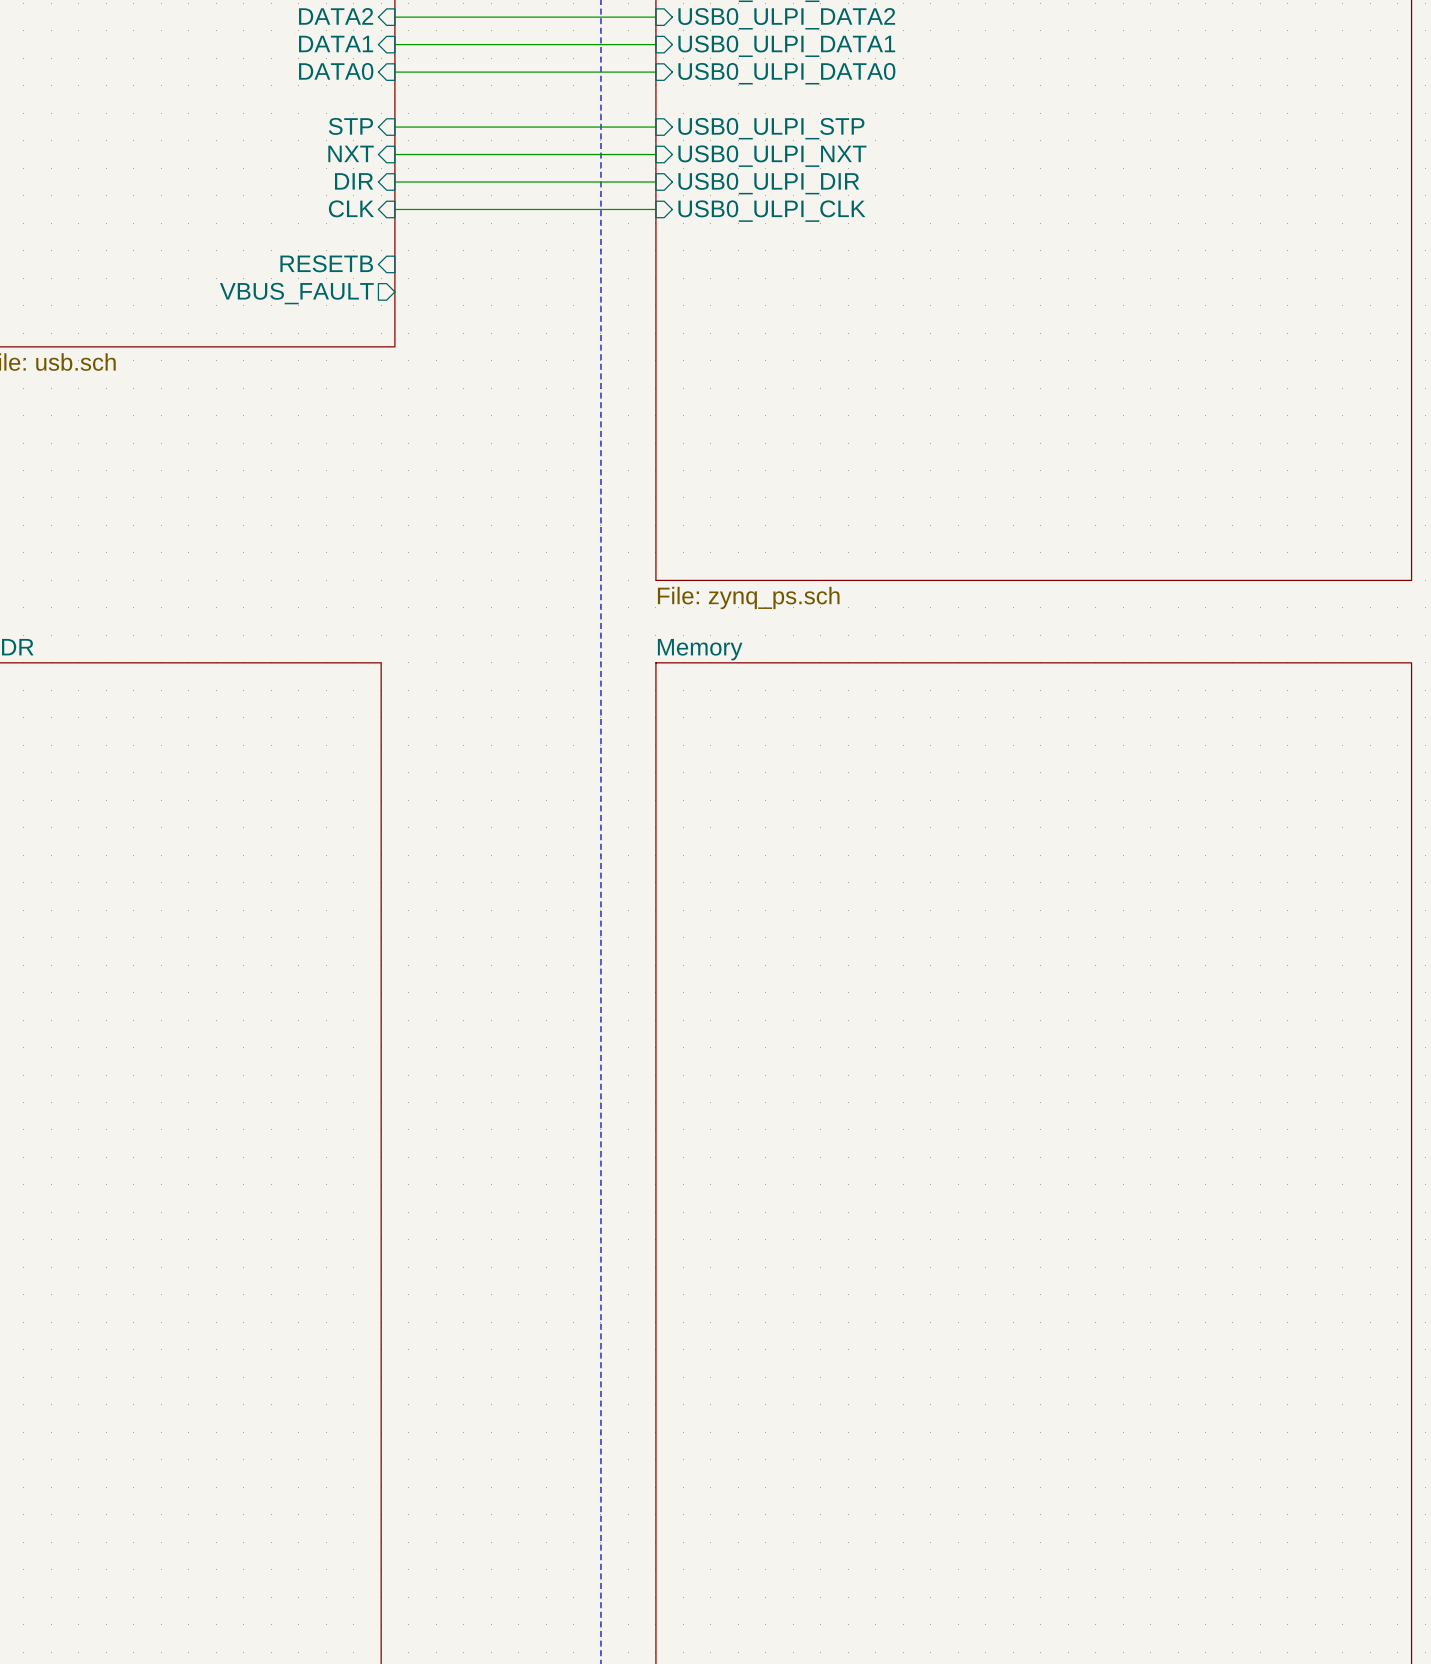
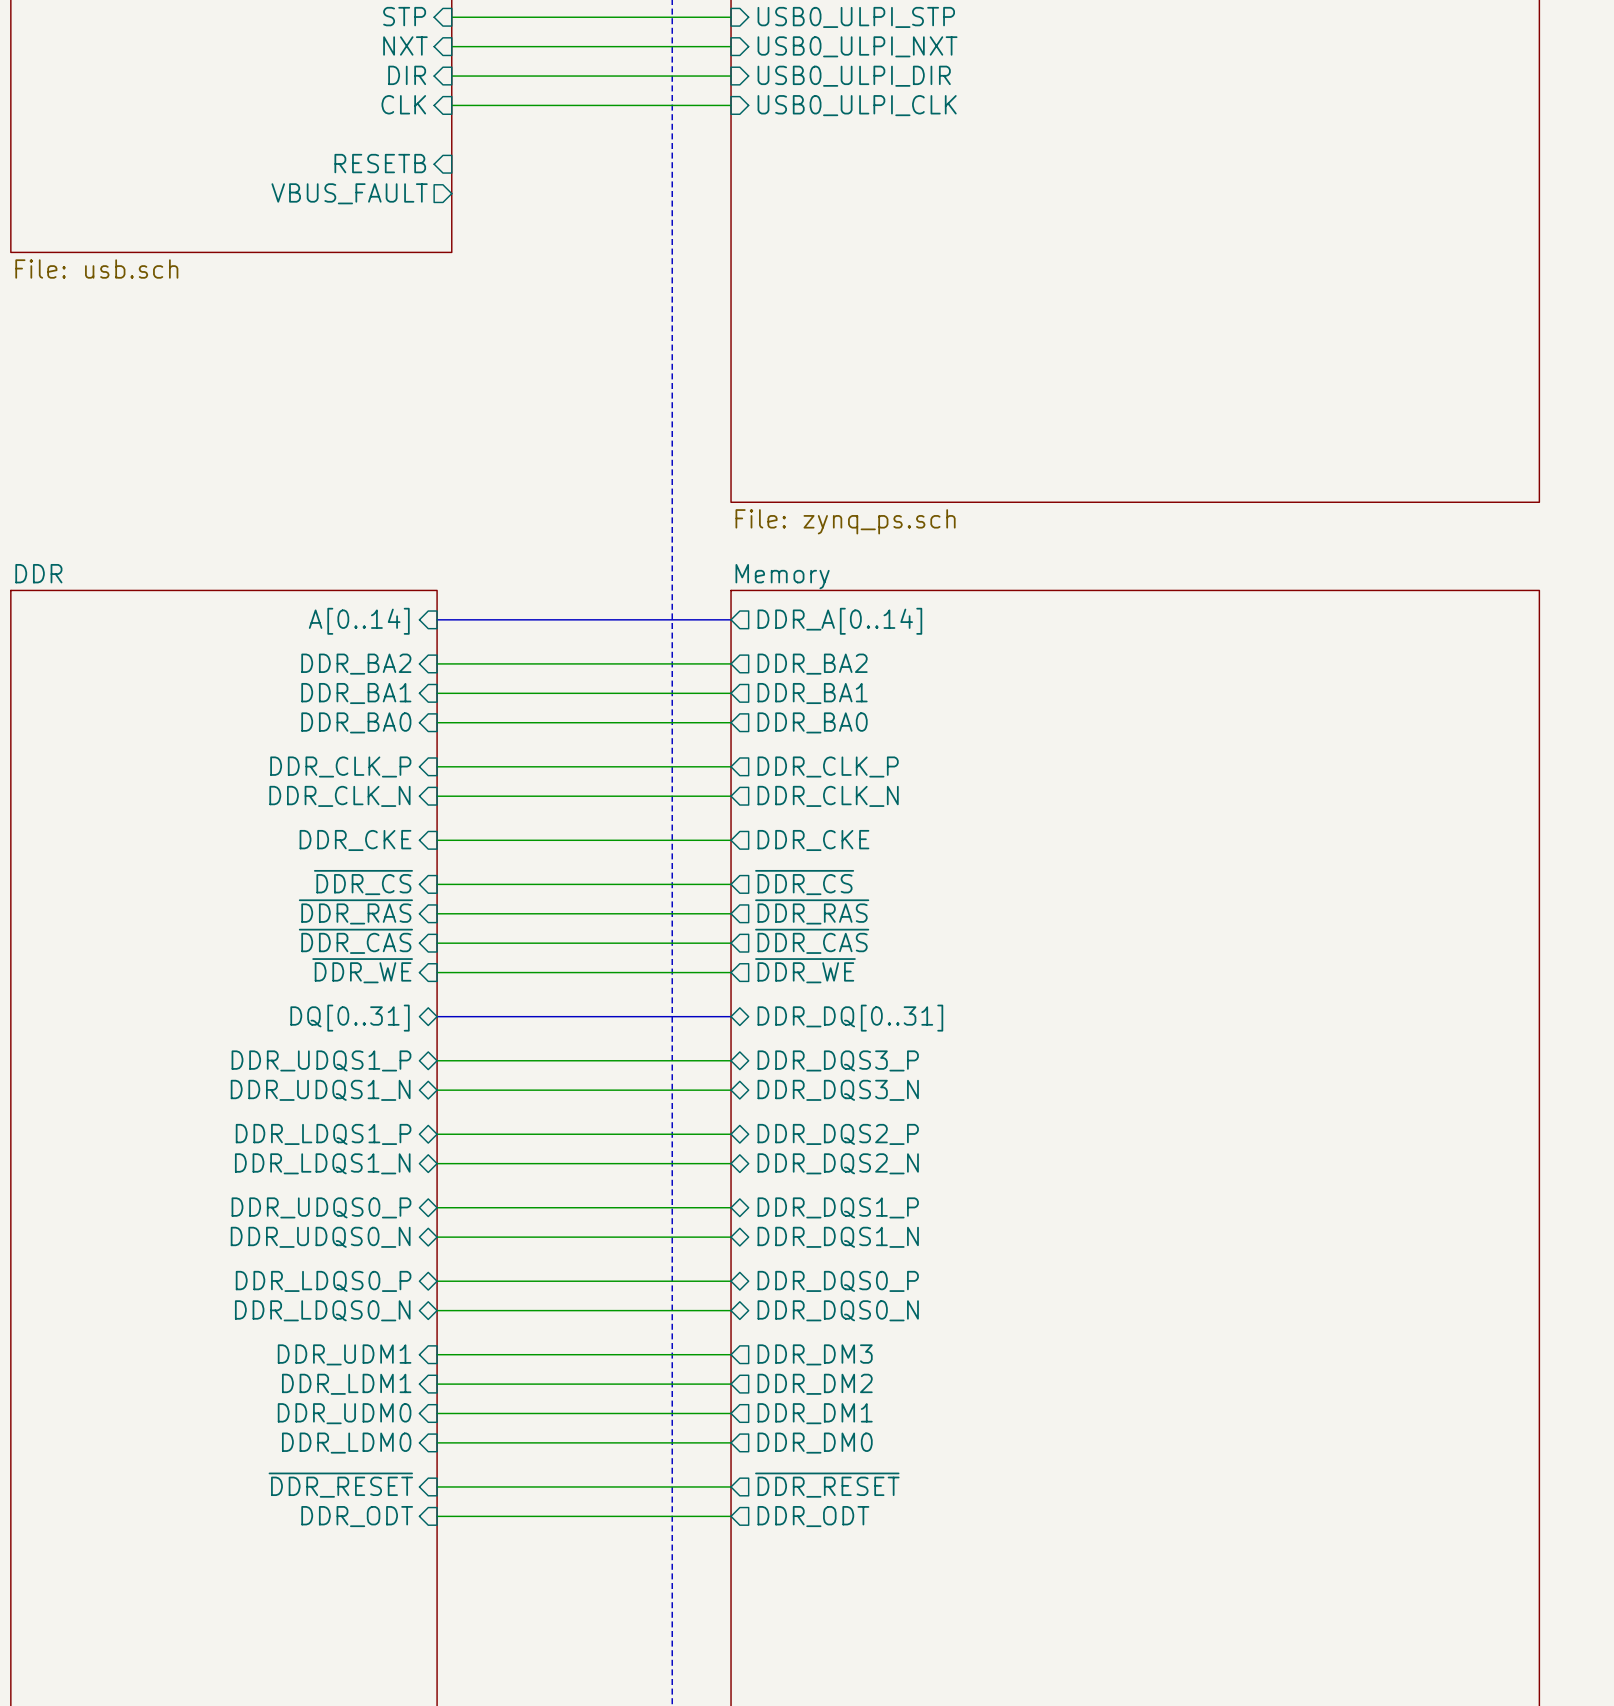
bus: none -> (437, 619) (731, 619)
sheet pin: none -> A[0..14] (359, 621)
sheet pin: none -> DDR_A[0..14] (839, 621)
wire: none -> (437, 663) (731, 663)
sheet pin: none -> DDR_BA2 (356, 664)
sheet pin: none -> DDR_BA2 (812, 664)
wire: none -> (437, 693) (731, 693)
sheet pin: none -> DDR_BA1 (356, 693)
sheet pin: none -> DDR_BA1 (812, 693)
wire: none -> (437, 722) (731, 722)
sheet pin: none -> DDR_BA0 (356, 722)
sheet pin: none -> DDR_BA0 (812, 722)
wire: none -> (437, 766) (731, 766)
sheet pin: none -> DDR_CLK_P (340, 766)
sheet pin: none -> DDR_CLK_P (828, 766)
wire: none -> (437, 796) (731, 796)
sheet pin: none -> DDR_CLK_N (339, 796)
sheet pin: none -> DDR_CLK_N (828, 796)
wire: none -> (437, 840) (731, 840)
sheet pin: none -> DDR_CKE (355, 840)
sheet pin: none -> DDR_CKE (813, 840)
sheet pin: none -> ~{DDR_CS} (363, 882)
wire: none -> (437, 884) (731, 884)
sheet pin: none -> ~{DDR_CS} (804, 882)
sheet pin: none -> ~{DDR_RAS} (355, 911)
sheet pin: none -> ~{DDR_RAS} (812, 911)
wire: none -> (437, 913) (731, 913)
sheet pin: none -> ~{DDR_CAS} (355, 941)
wire: none -> (437, 943) (731, 943)
sheet pin: none -> ~{DDR_CAS} (812, 941)
sheet pin: none -> ~{DDR_WE} (362, 970)
sheet pin: none -> ~{DDR_WE} (805, 970)
wire: none -> (437, 972) (731, 972)
bus: none -> (437, 1016) (731, 1016)
sheet pin: none -> DQ[0..31] (350, 1018)
sheet pin: none -> DDR_DQ[0..31] (850, 1018)
wire: none -> (437, 1060) (731, 1060)
sheet pin: none -> DDR_UDQS1_P (321, 1060)
sheet pin: none -> DDR_DQS3_P (838, 1060)
wire: none -> (437, 1090) (731, 1090)
sheet pin: none -> DDR_UDQS1_N (320, 1090)
sheet pin: none -> DDR_DQS3_N (838, 1090)
wire: none -> (437, 1134) (731, 1134)
sheet pin: none -> DDR_LDQS1_P (323, 1134)
sheet pin: none -> DDR_DQS2_P (838, 1134)
wire: none -> (437, 1163) (731, 1163)
sheet pin: none -> DDR_LDQS1_N (322, 1163)
sheet pin: none -> DDR_DQS2_N (838, 1163)
wire: none -> (437, 1207) (731, 1207)
sheet pin: none -> DDR_UDQS0_P (321, 1207)
sheet pin: none -> DDR_DQS1_P (838, 1207)
wire: none -> (437, 1237) (731, 1237)
sheet pin: none -> DDR_UDQS0_N (320, 1237)
sheet pin: none -> DDR_DQS1_N (838, 1237)
wire: none -> (437, 1281) (731, 1281)
sheet pin: none -> DDR_LDQS0_P (323, 1281)
sheet pin: none -> DDR_DQS0_P (838, 1281)
wire: none -> (437, 1310) (731, 1310)
sheet pin: none -> DDR_LDQS0_N (322, 1310)
sheet pin: none -> DDR_DQS0_N (838, 1310)
wire: none -> (437, 1354) (731, 1354)
sheet pin: none -> DDR_DM3 (815, 1354)
sheet pin: none -> DDR_UDM1 (344, 1354)
wire: none -> (437, 1384) (731, 1384)
sheet pin: none -> DDR_LDM1 (346, 1384)
sheet pin: none -> DDR_DM2 (815, 1384)
wire: none -> (437, 1413) (731, 1413)
sheet pin: none -> DDR_UDM0 (344, 1413)
sheet pin: none -> DDR_DM1 (815, 1413)
wire: none -> (437, 1442) (731, 1442)
sheet pin: none -> DDR_LDM0 (346, 1443)
sheet pin: none -> DDR_DM0 (815, 1443)
sheet pin: none -> ~{DDR_RESET} (340, 1485)
wire: none -> (437, 1486) (731, 1486)
sheet pin: none -> ~{DDR_RESET} (827, 1485)
wire: none -> (437, 1516) (731, 1516)
sheet pin: none -> DDR_ODT (357, 1516)
sheet pin: none -> DDR_ODT (813, 1516)

